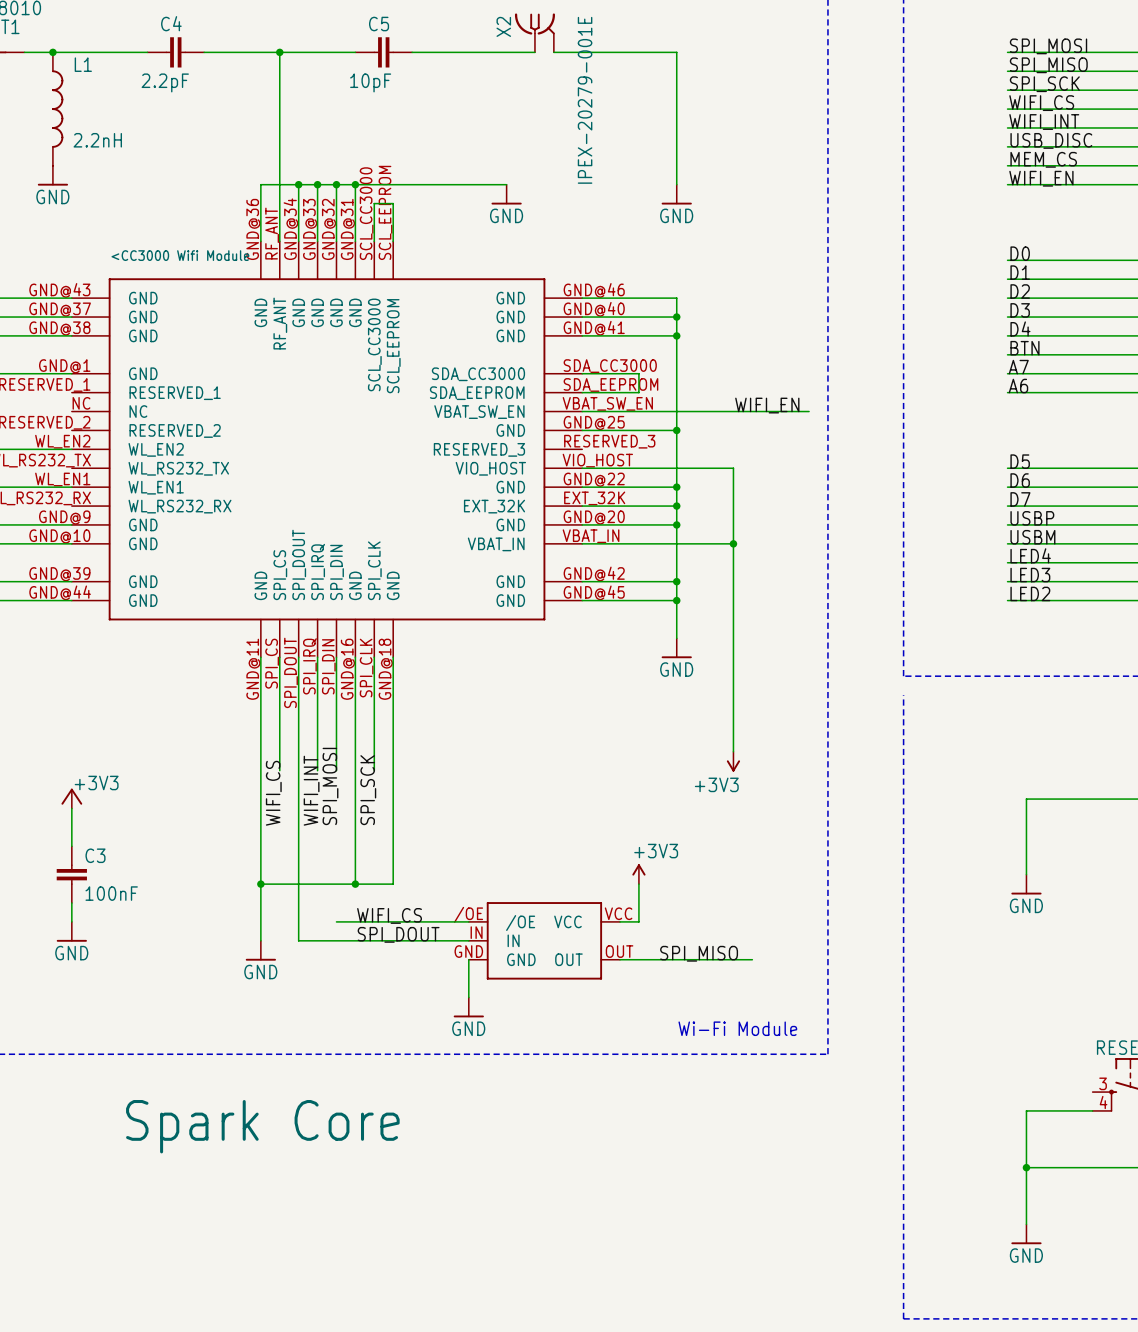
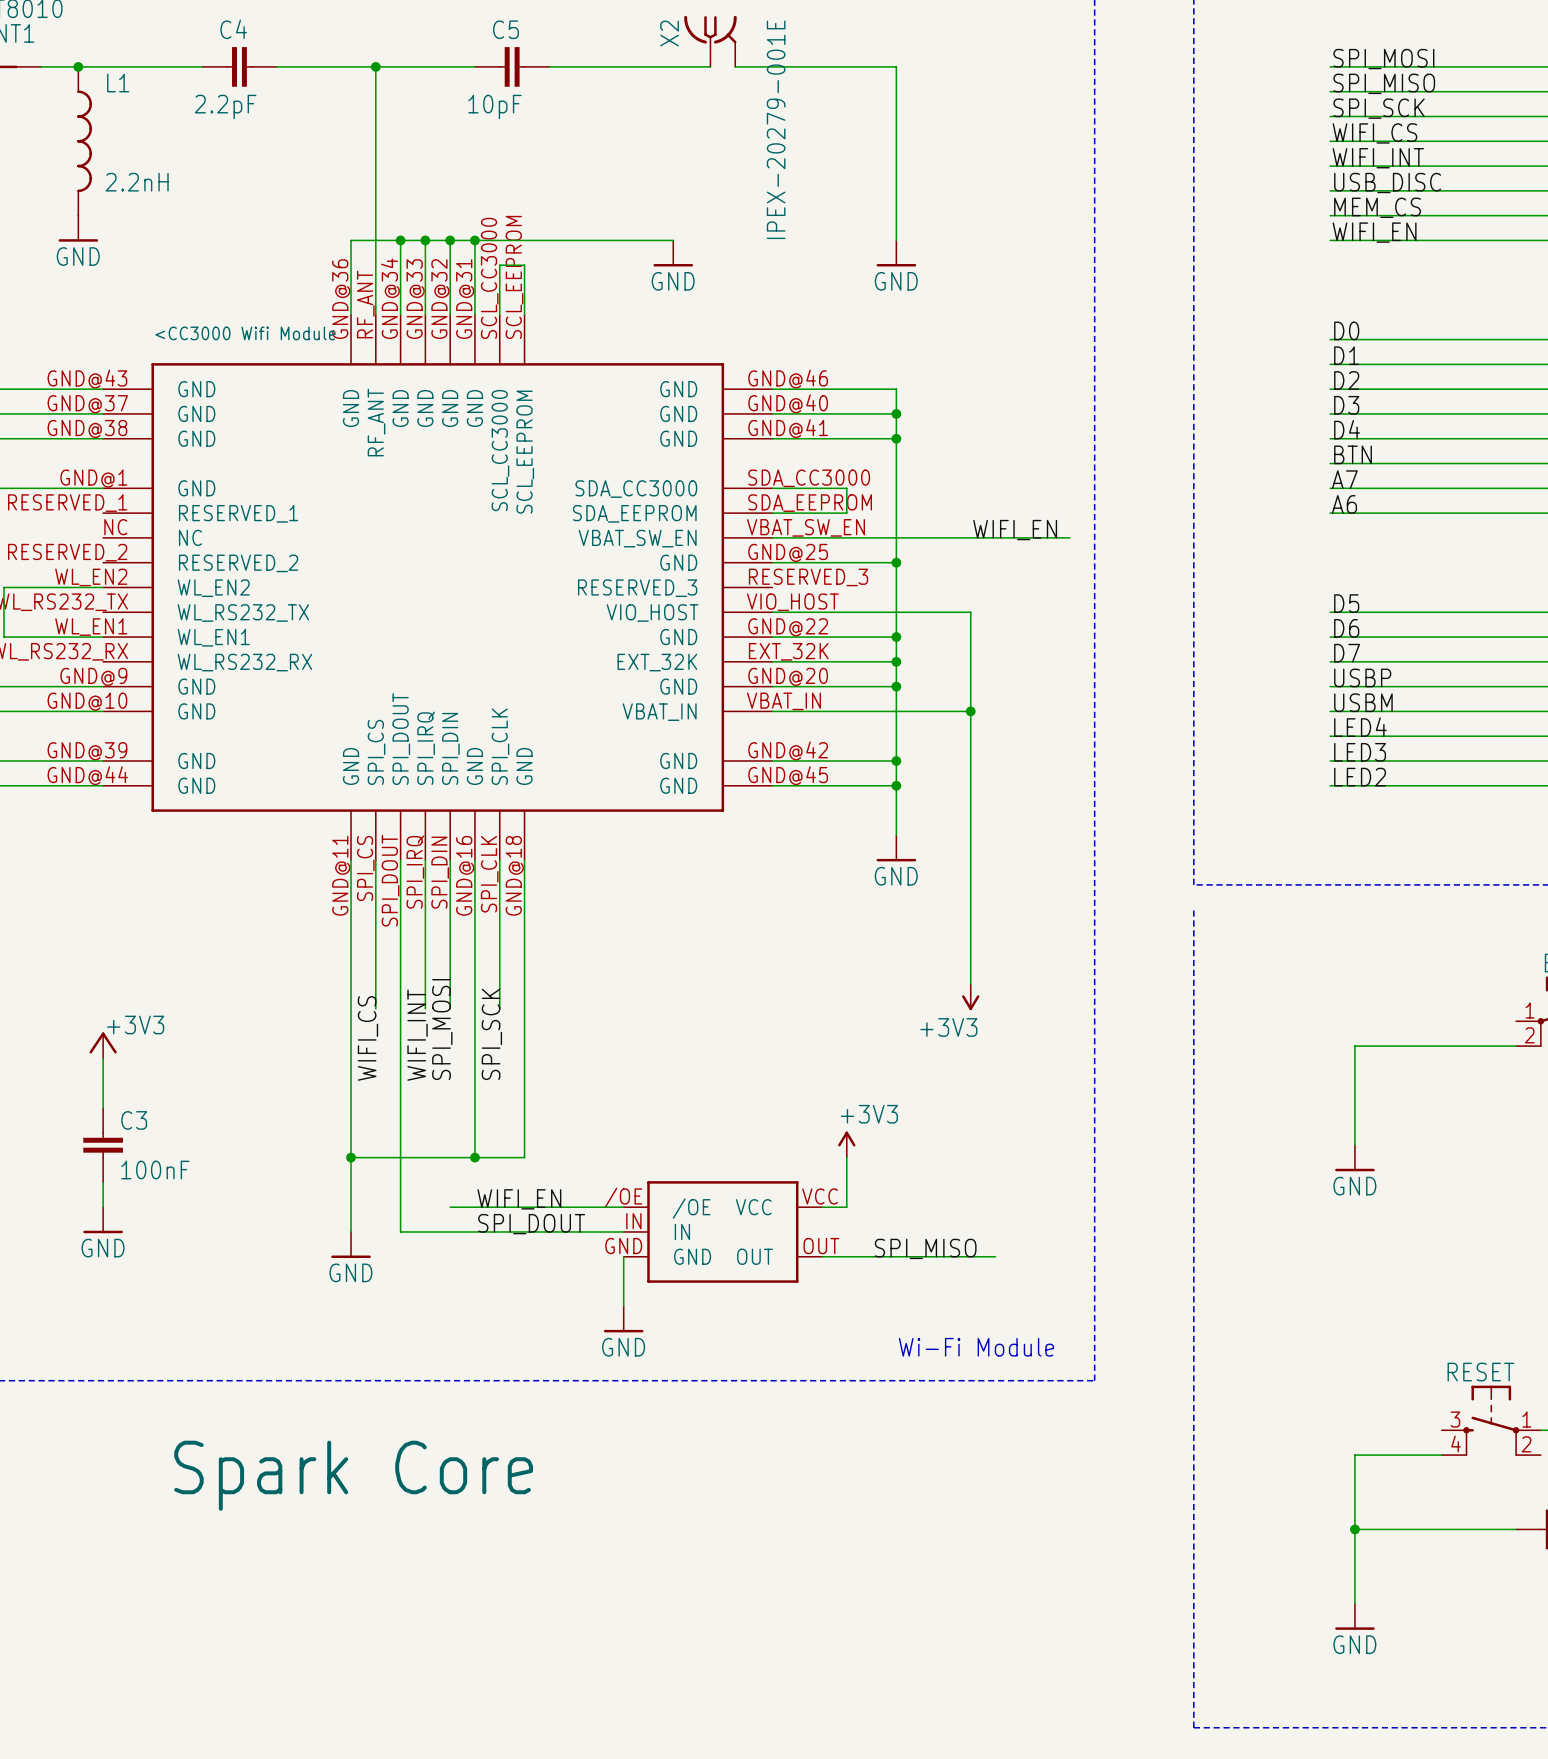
label: WIFI_CS (389, 915) -> WIFI_EN (519, 1199)

